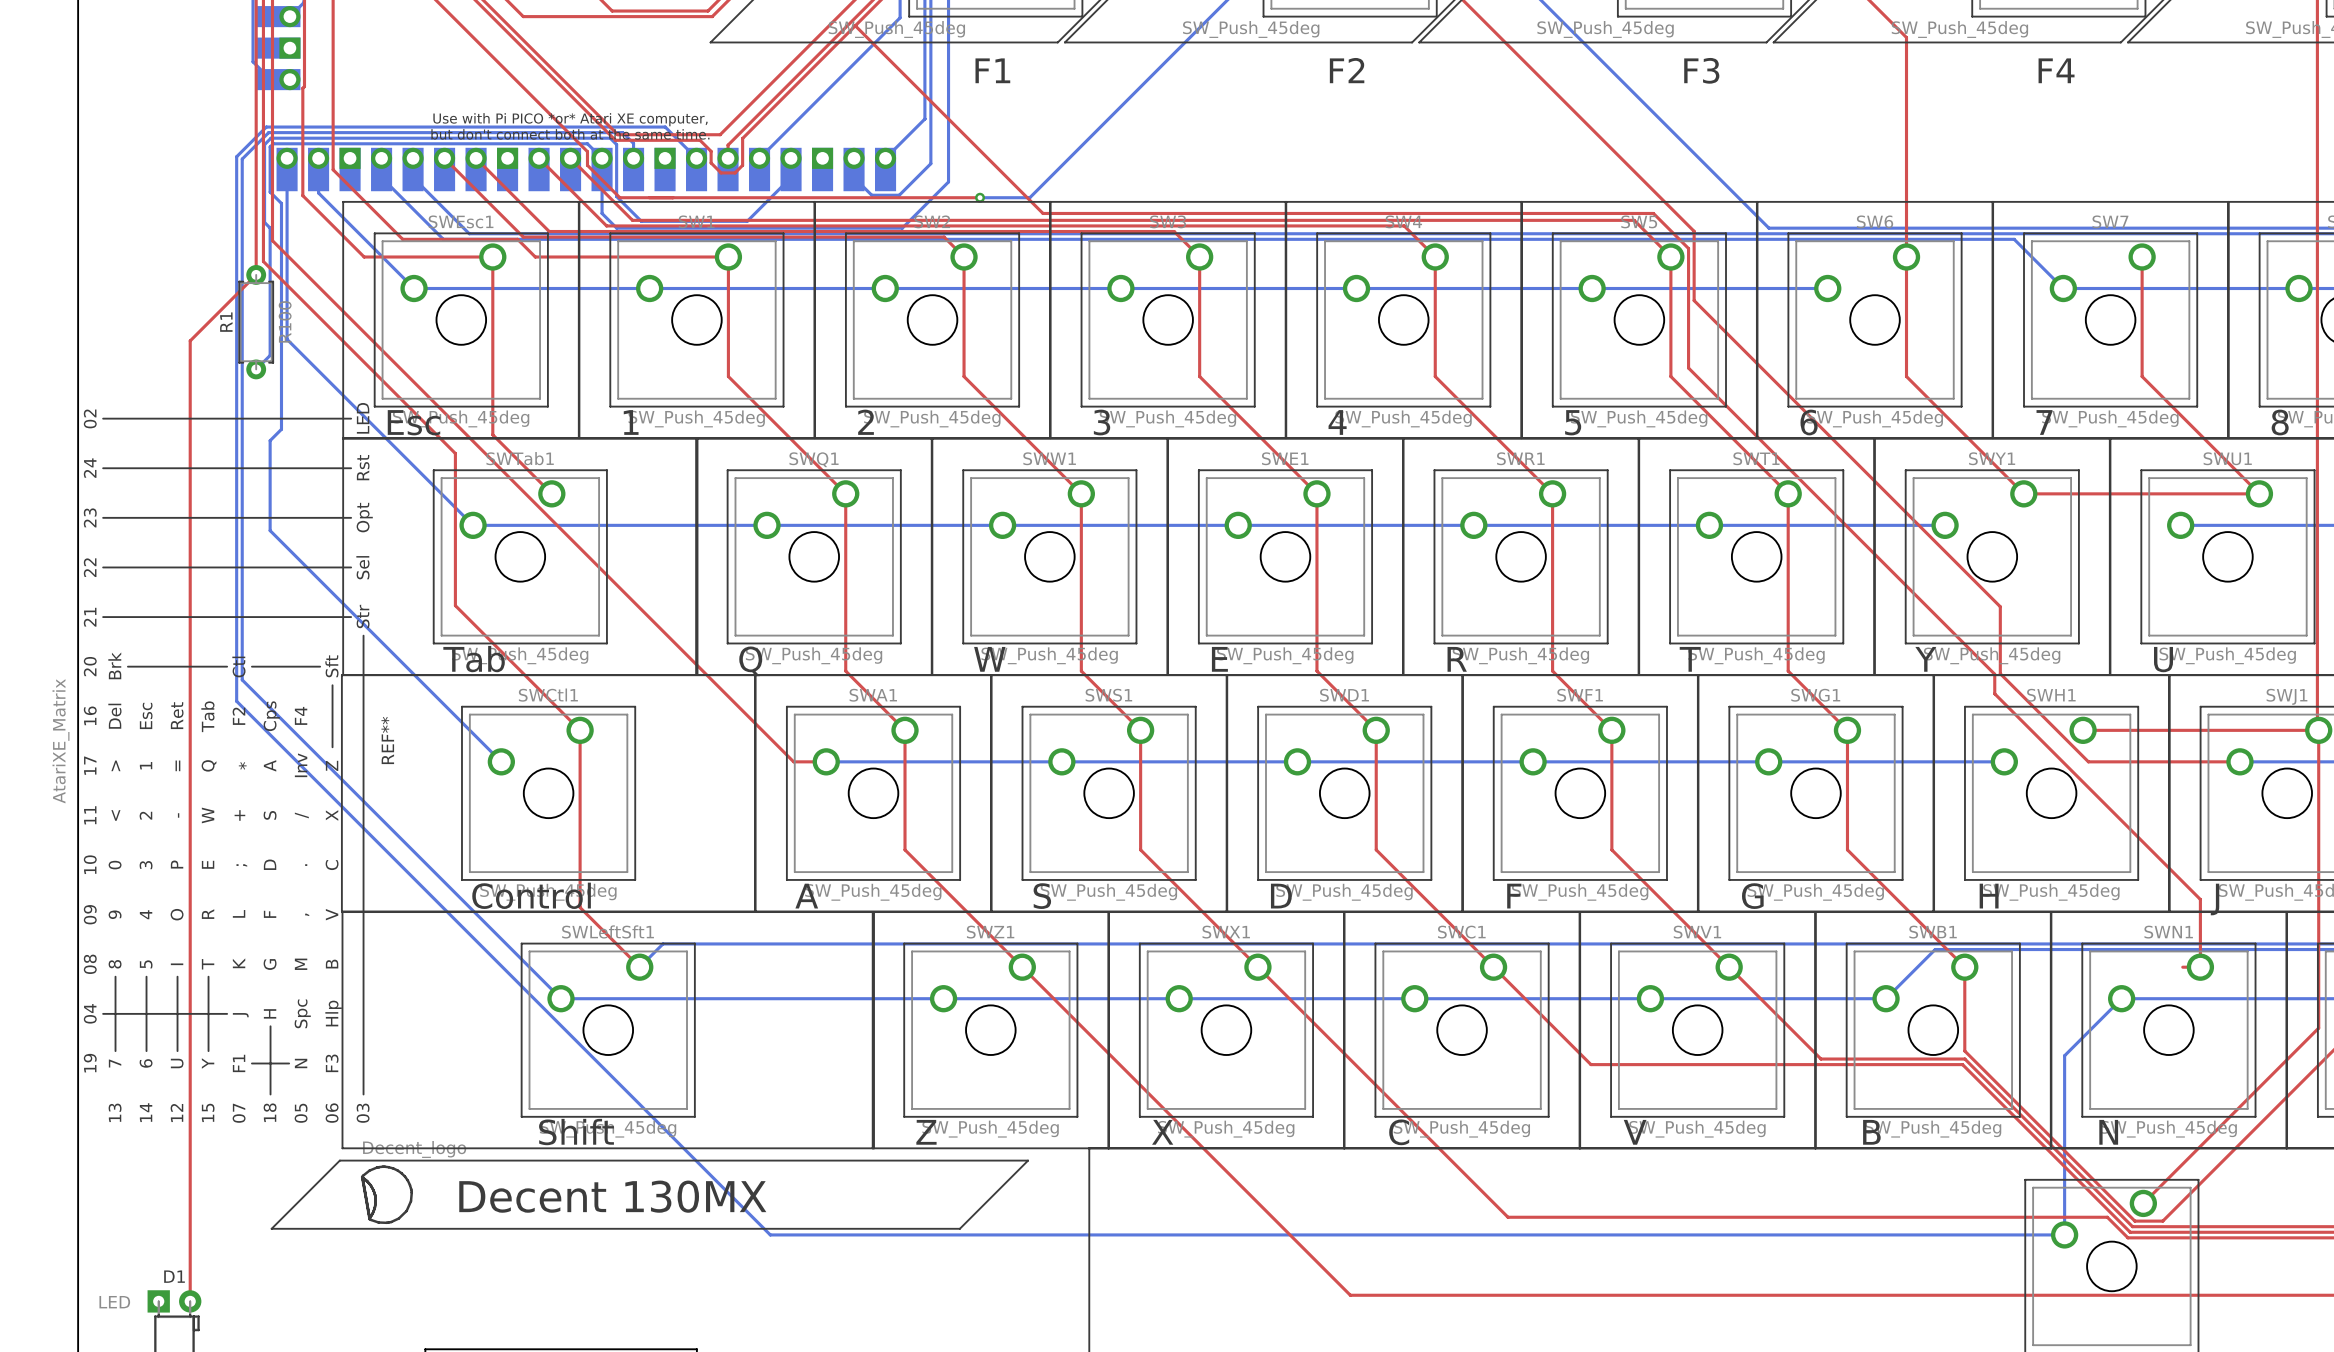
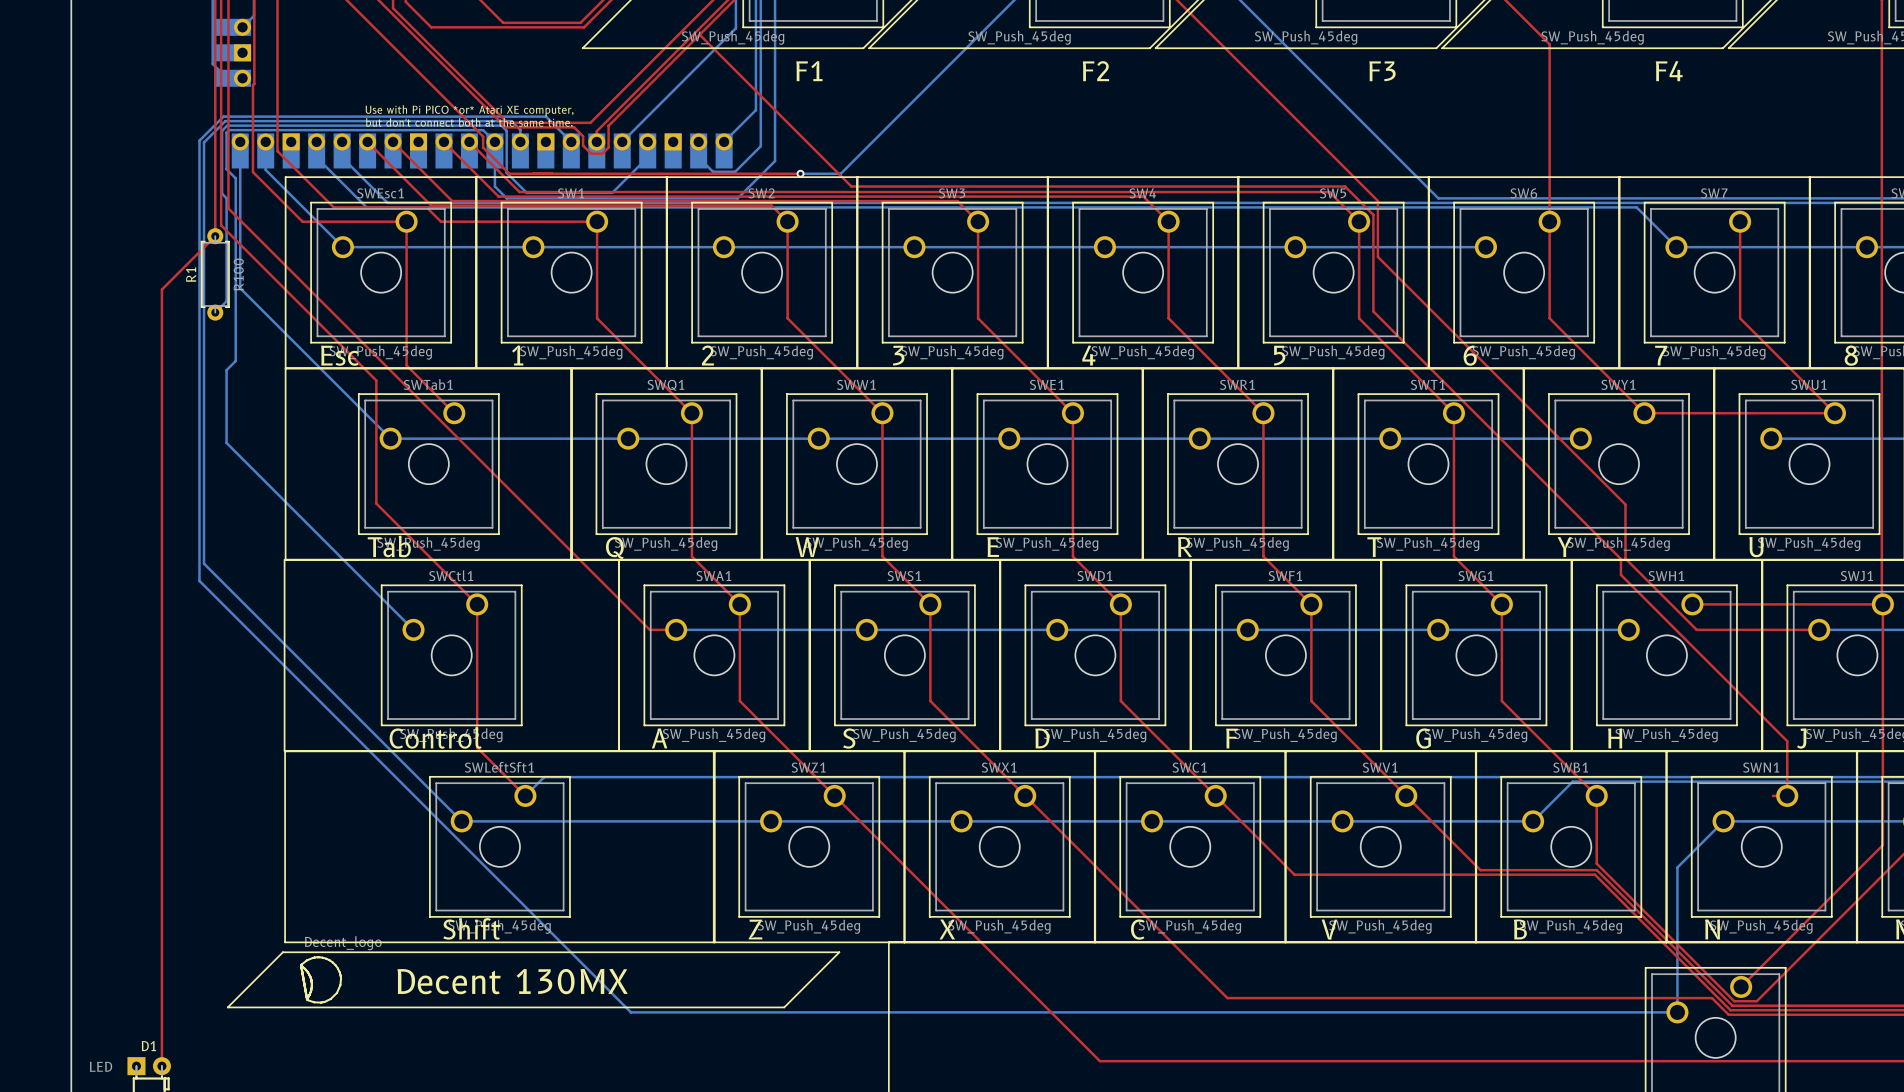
REF**: AtariXE_Matrix (233, 756) -> none

